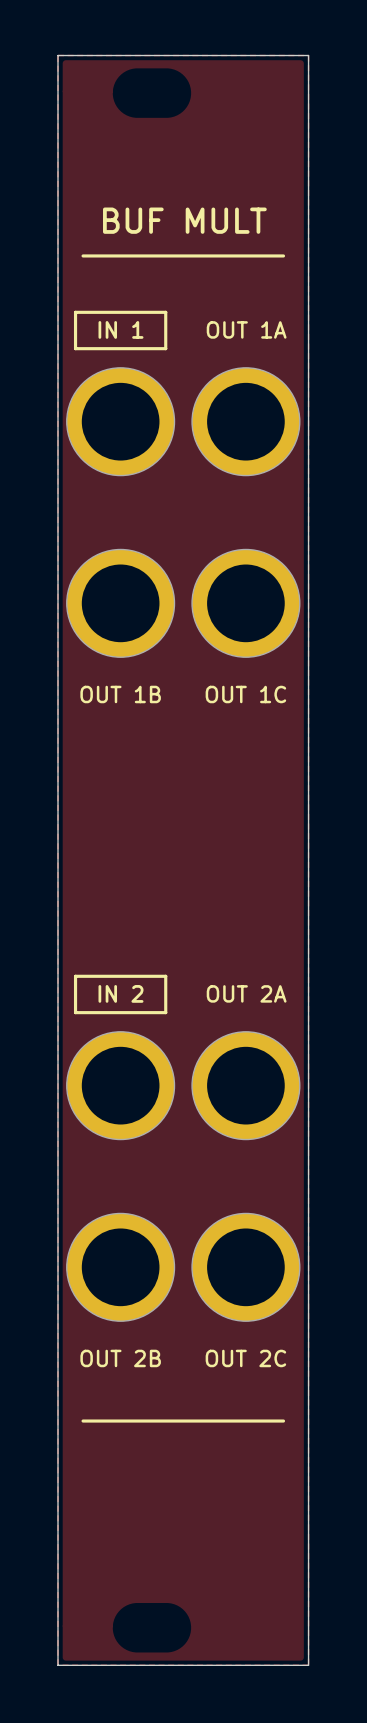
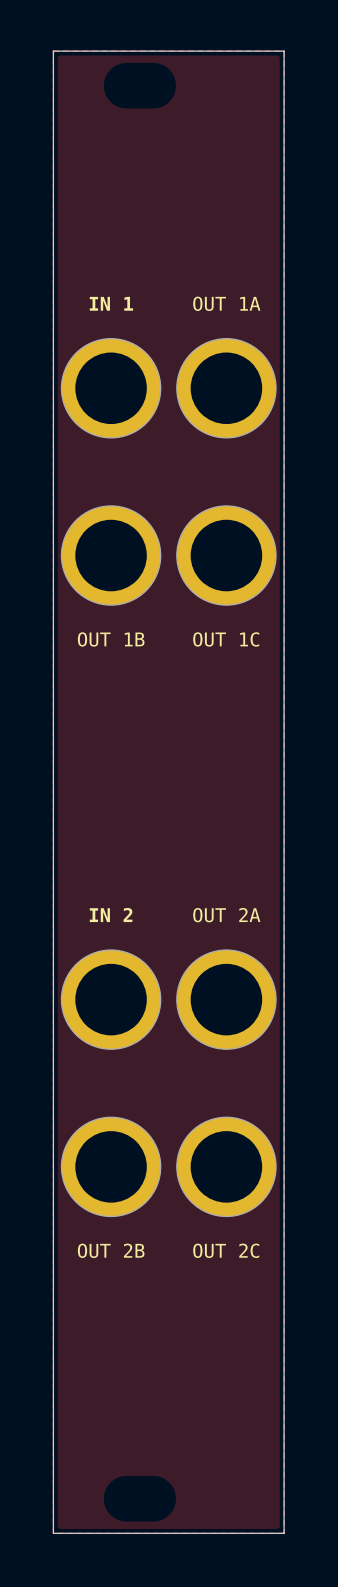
text: BUF MULT (184, 220) -> none
line: (83, 255) (283, 255) -> none
line: (75, 312) (165, 312) (165, 348) (75, 348) (75, 312) -> none
line: (75, 976) (75, 1012) (165, 1012) (165, 976) (75, 976) -> none
line: (83, 1421) (283, 1421) -> none

